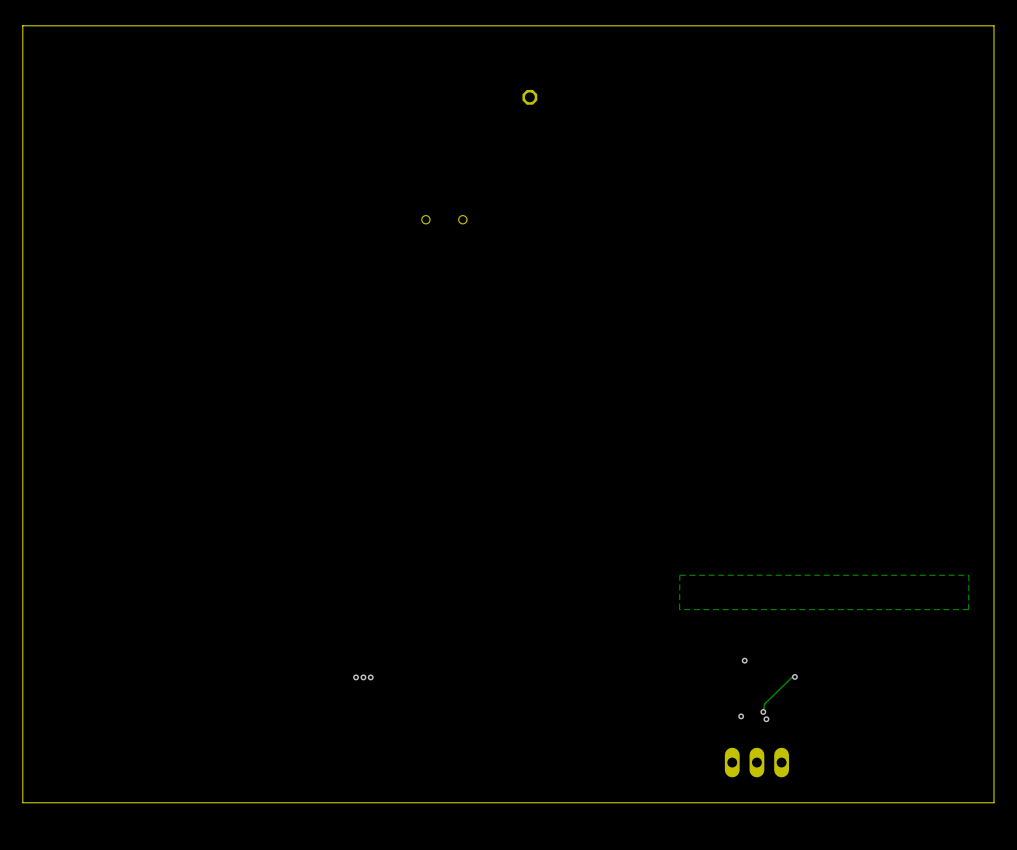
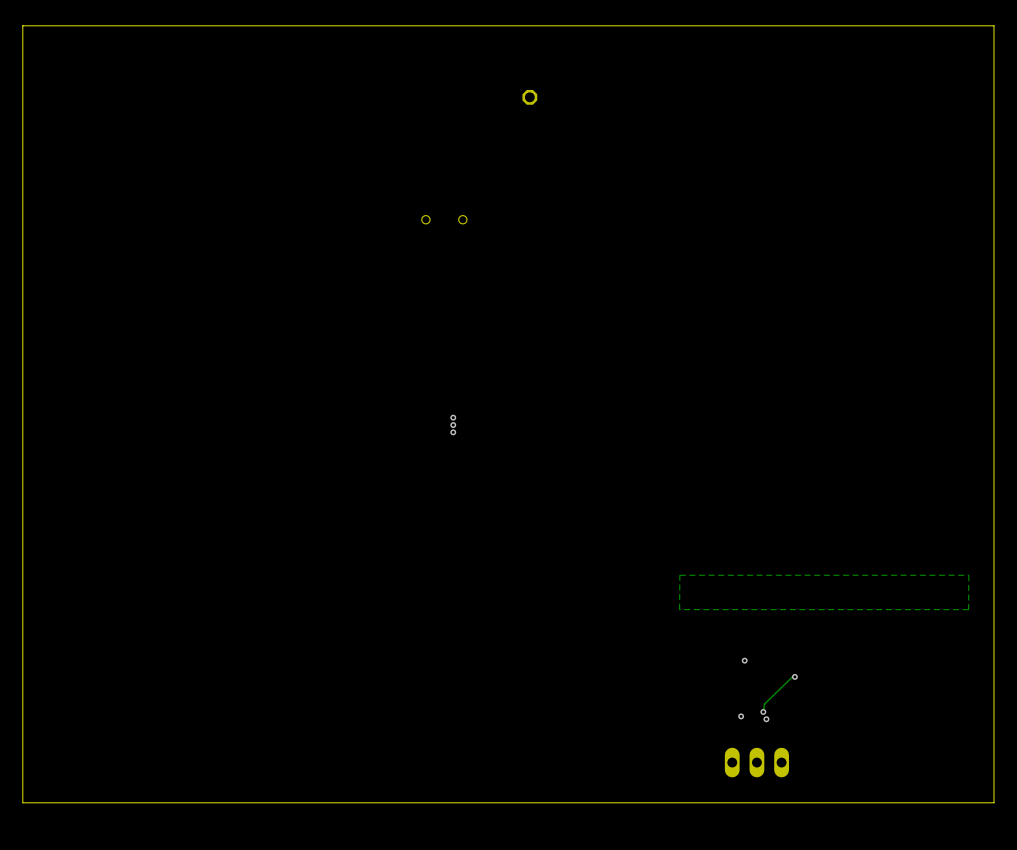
via: none -> (453, 417)
via: none -> (453, 425)
via: none -> (453, 432)
via: (356, 677) -> none
via: (363, 677) -> none
via: (370, 677) -> none

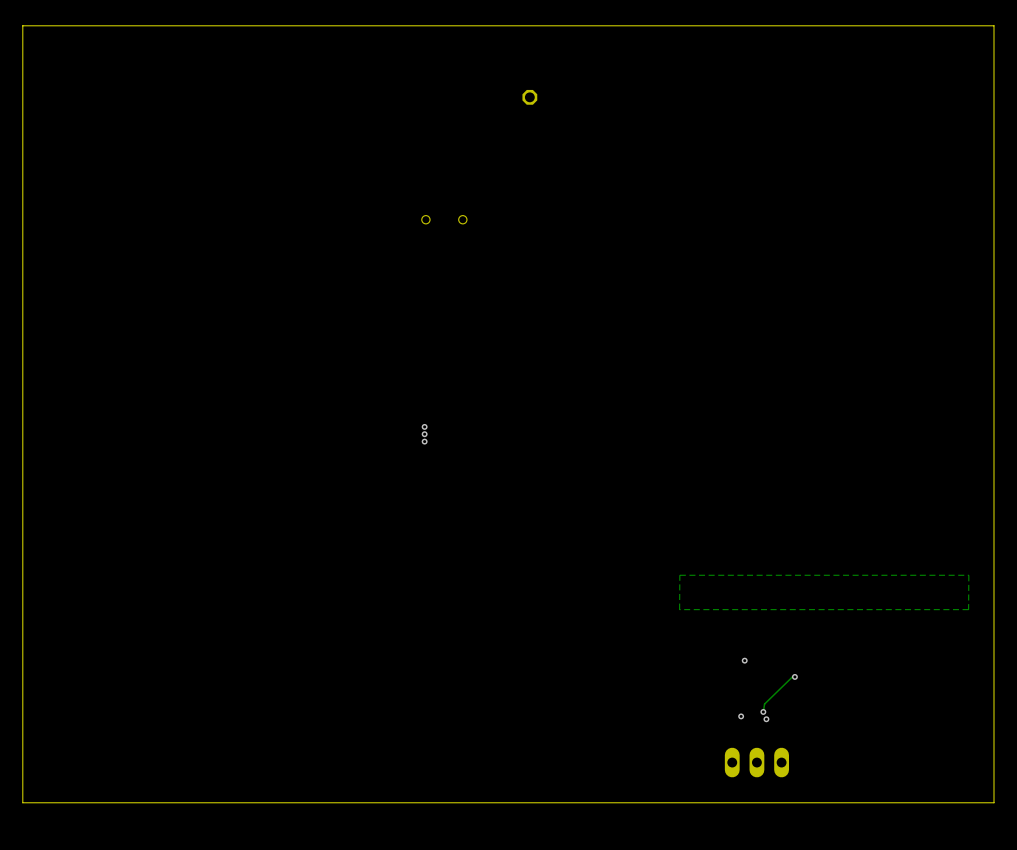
via: (453, 417) -> none
via: (453, 425) -> none
via: none -> (424, 426)
via: (453, 432) -> none
via: none -> (424, 434)
via: none -> (424, 441)

